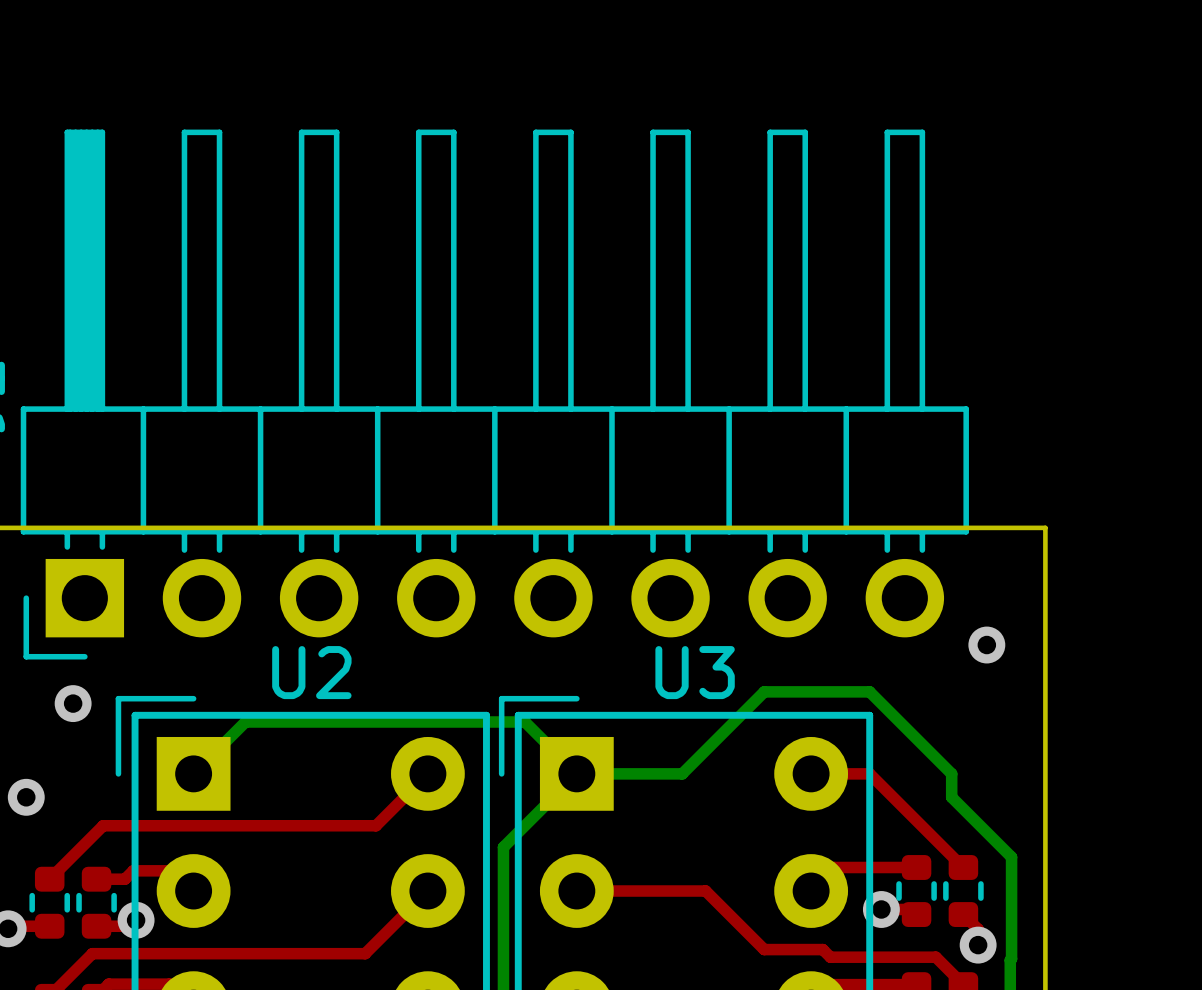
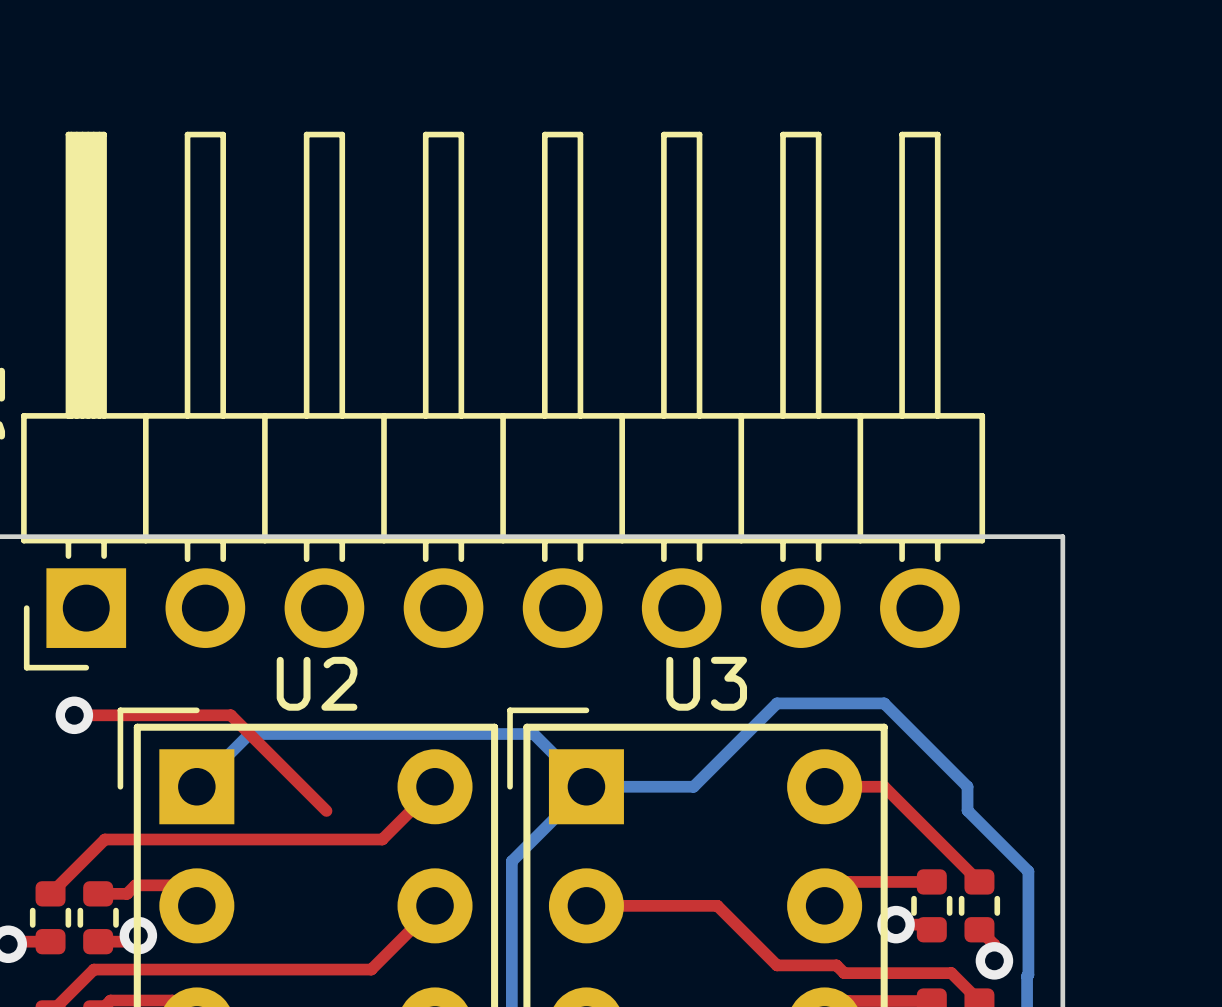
via: (986, 645) -> none
top track: none -> (74, 715) (230, 715) (326, 810)
via: (26, 797) -> none

